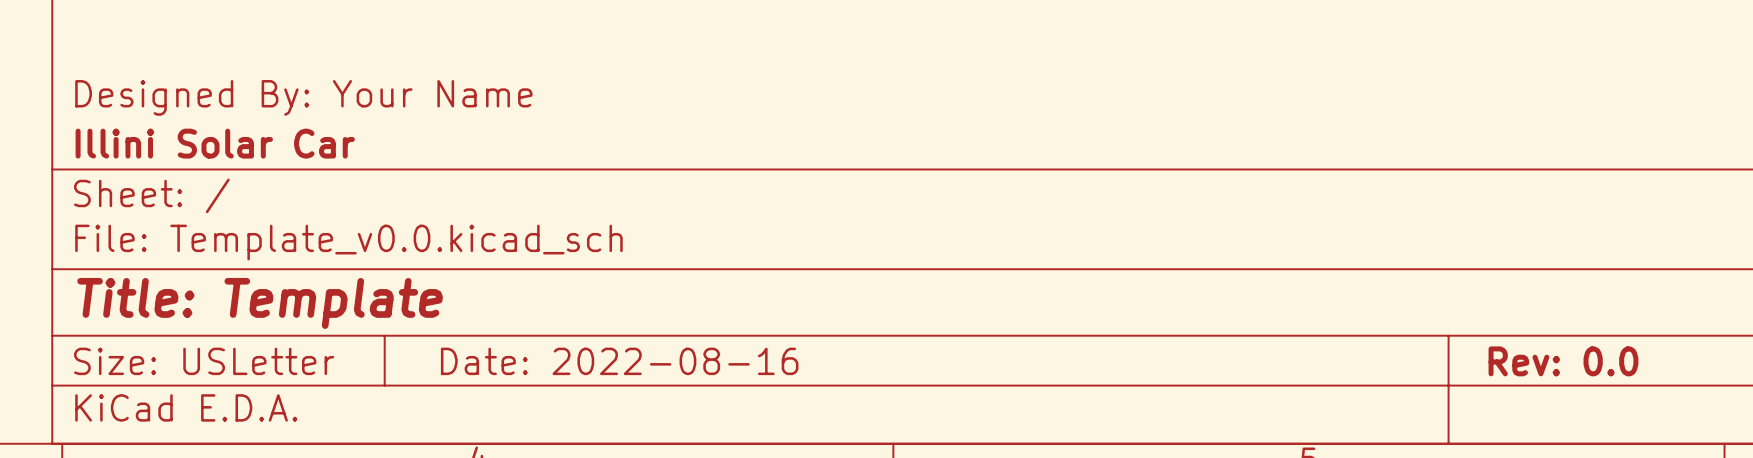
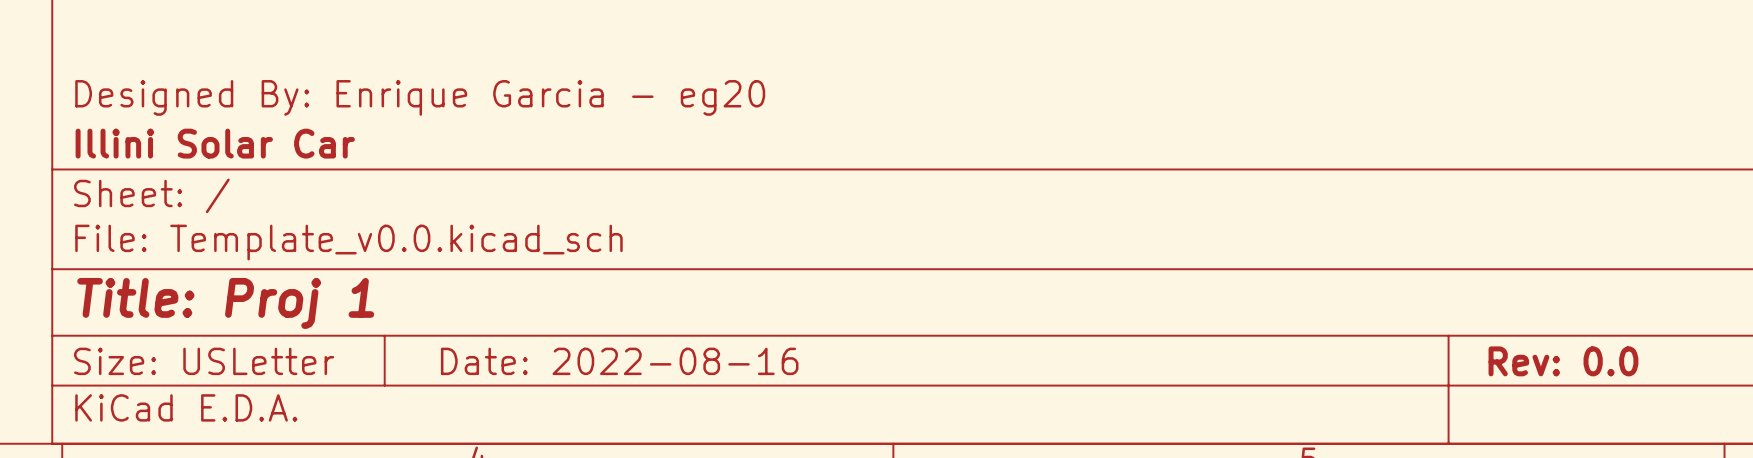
title block: Designed By: Your Name (303, 97) -> Designed By: Enrique Garcia - eg20 (420, 97)
title block: Title: Template (260, 303) -> Title: Proj 1 (225, 303)

